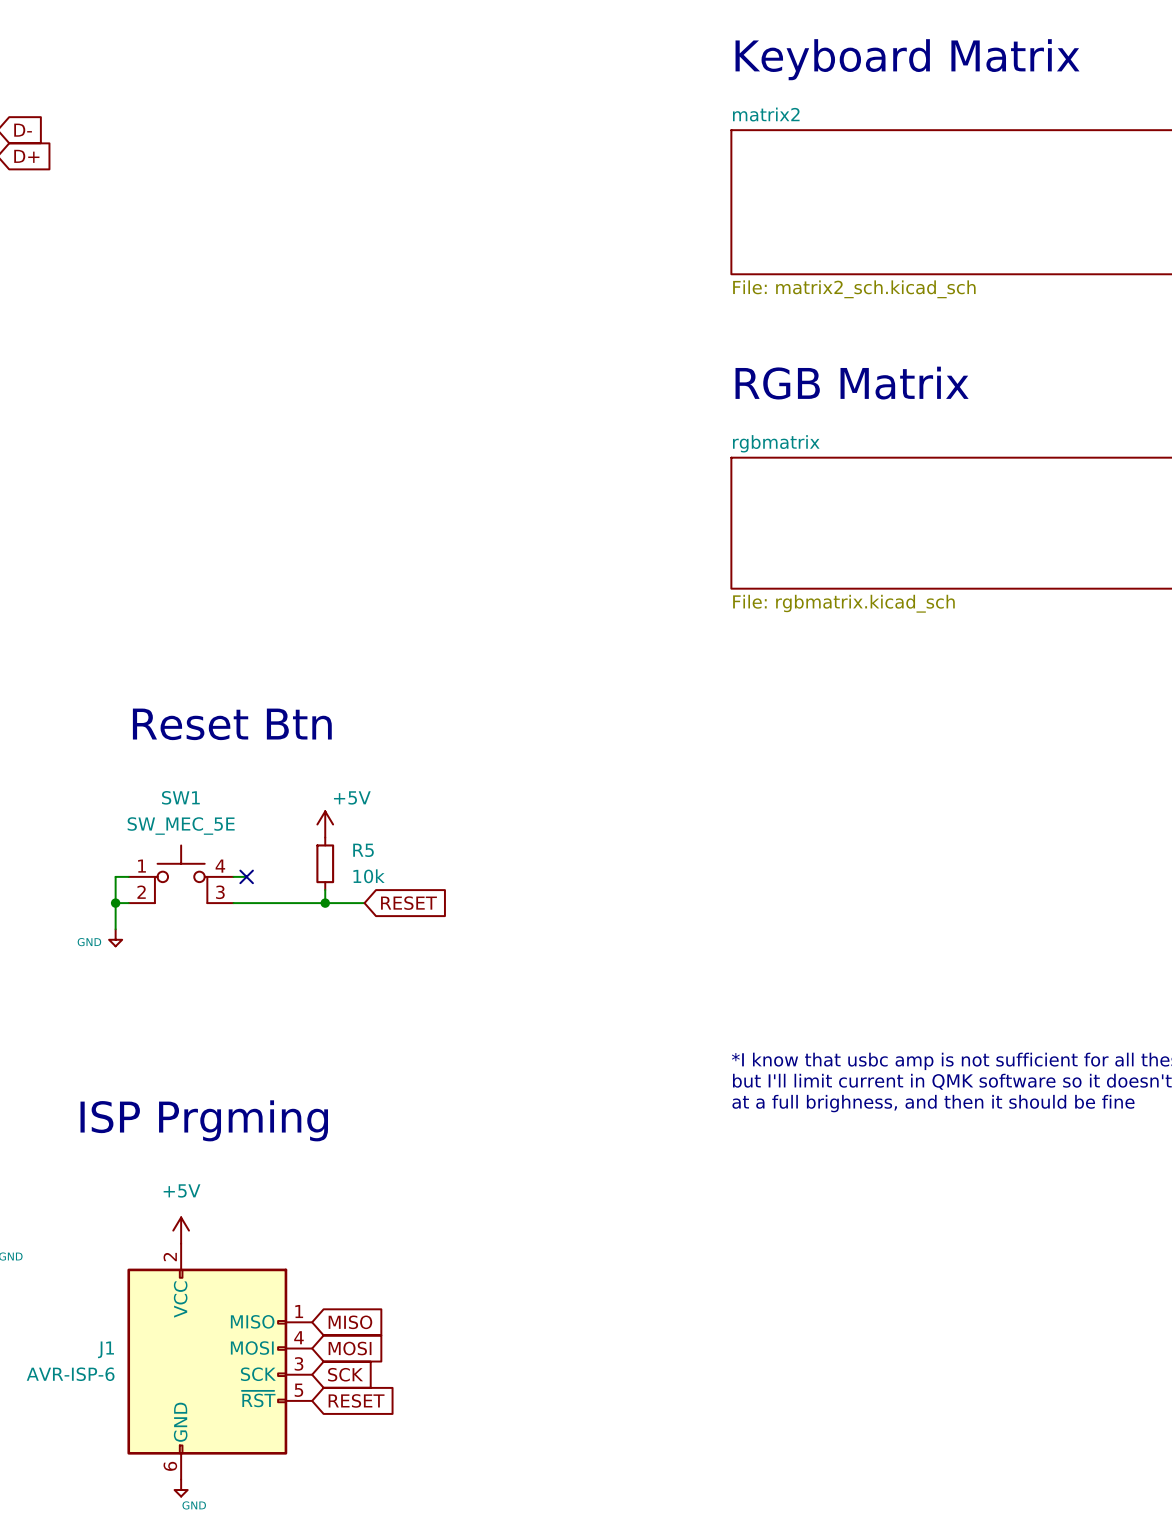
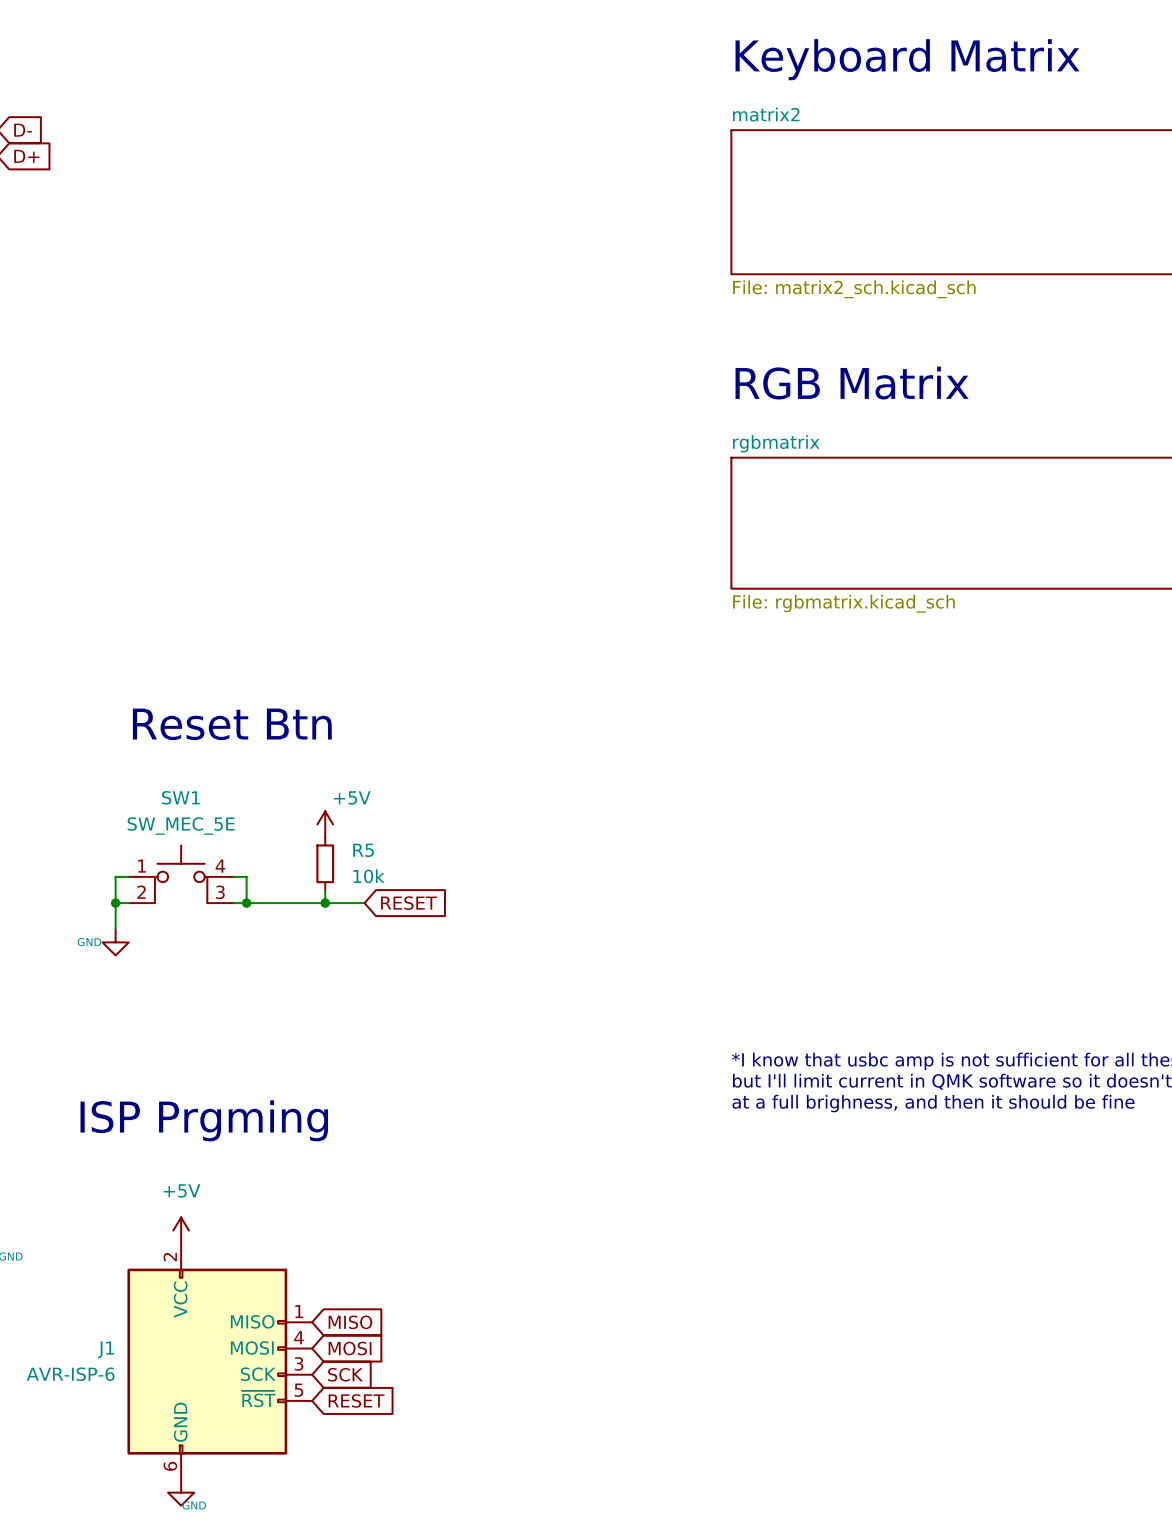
wire: none -> (246, 876) (246, 903)
no-connect mark: (246, 876) -> none
junction: none -> (246, 903)
power symbol shape: [109, 929, 123, 947] -> [102, 929, 129, 956]
power symbol shape: [174, 1479, 188, 1497] -> [168, 1479, 195, 1506]

